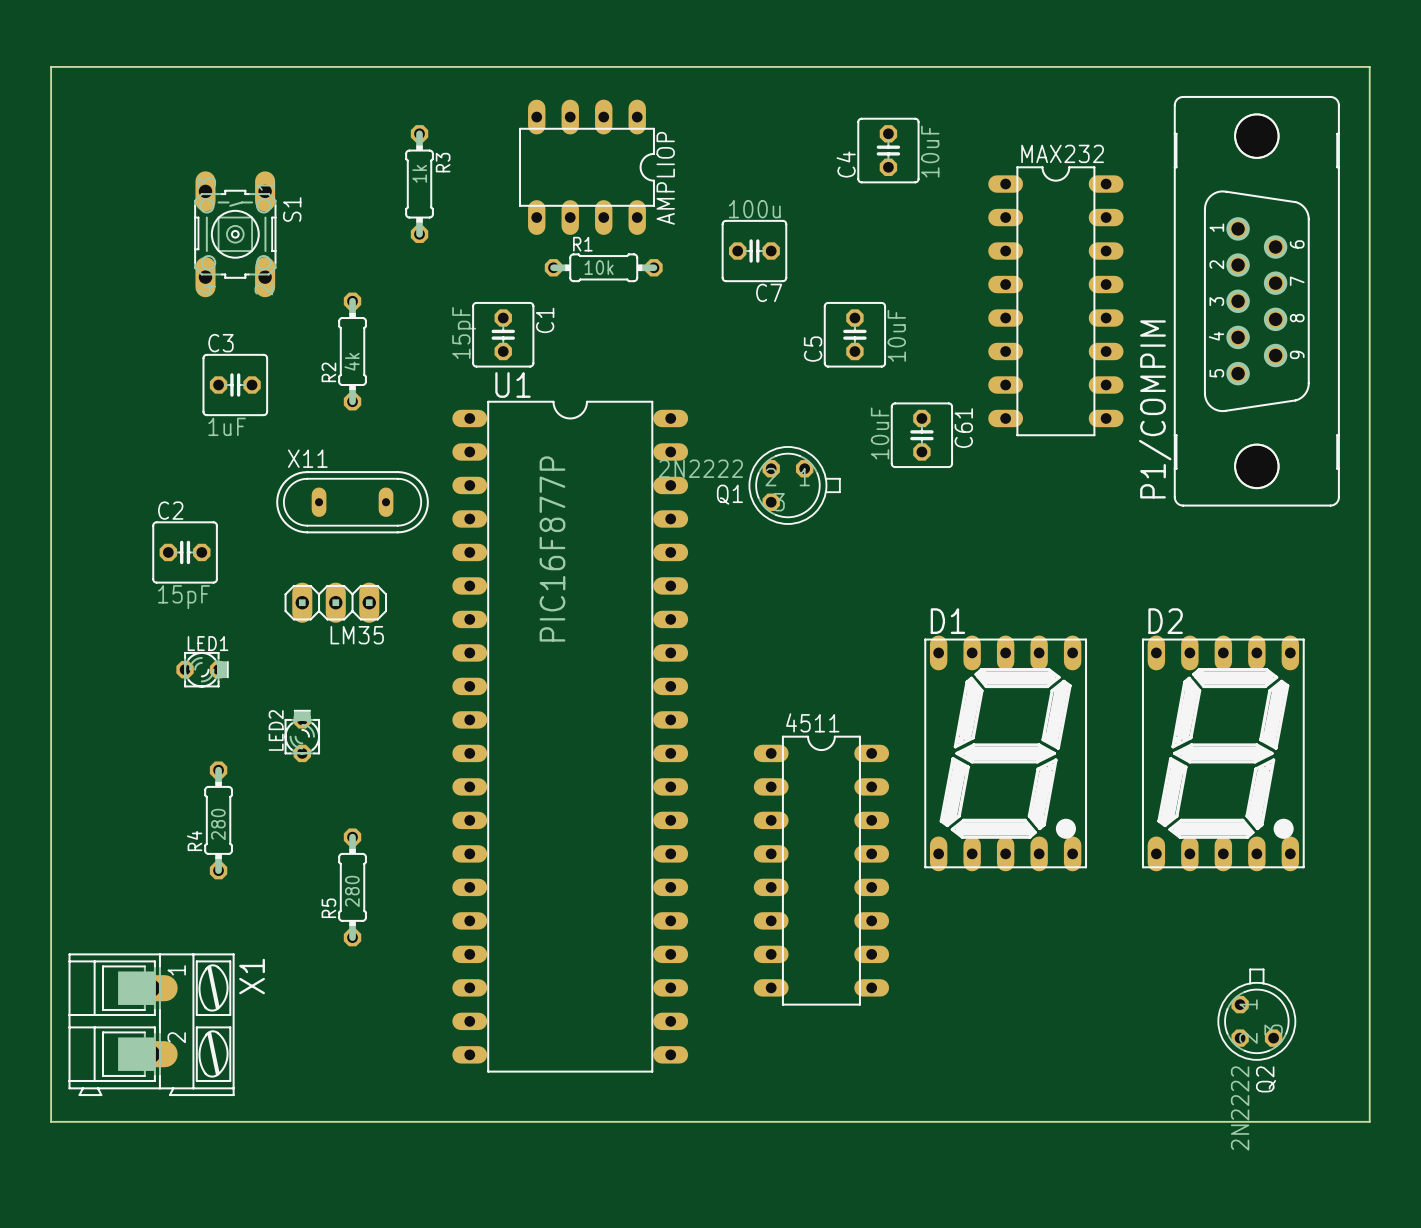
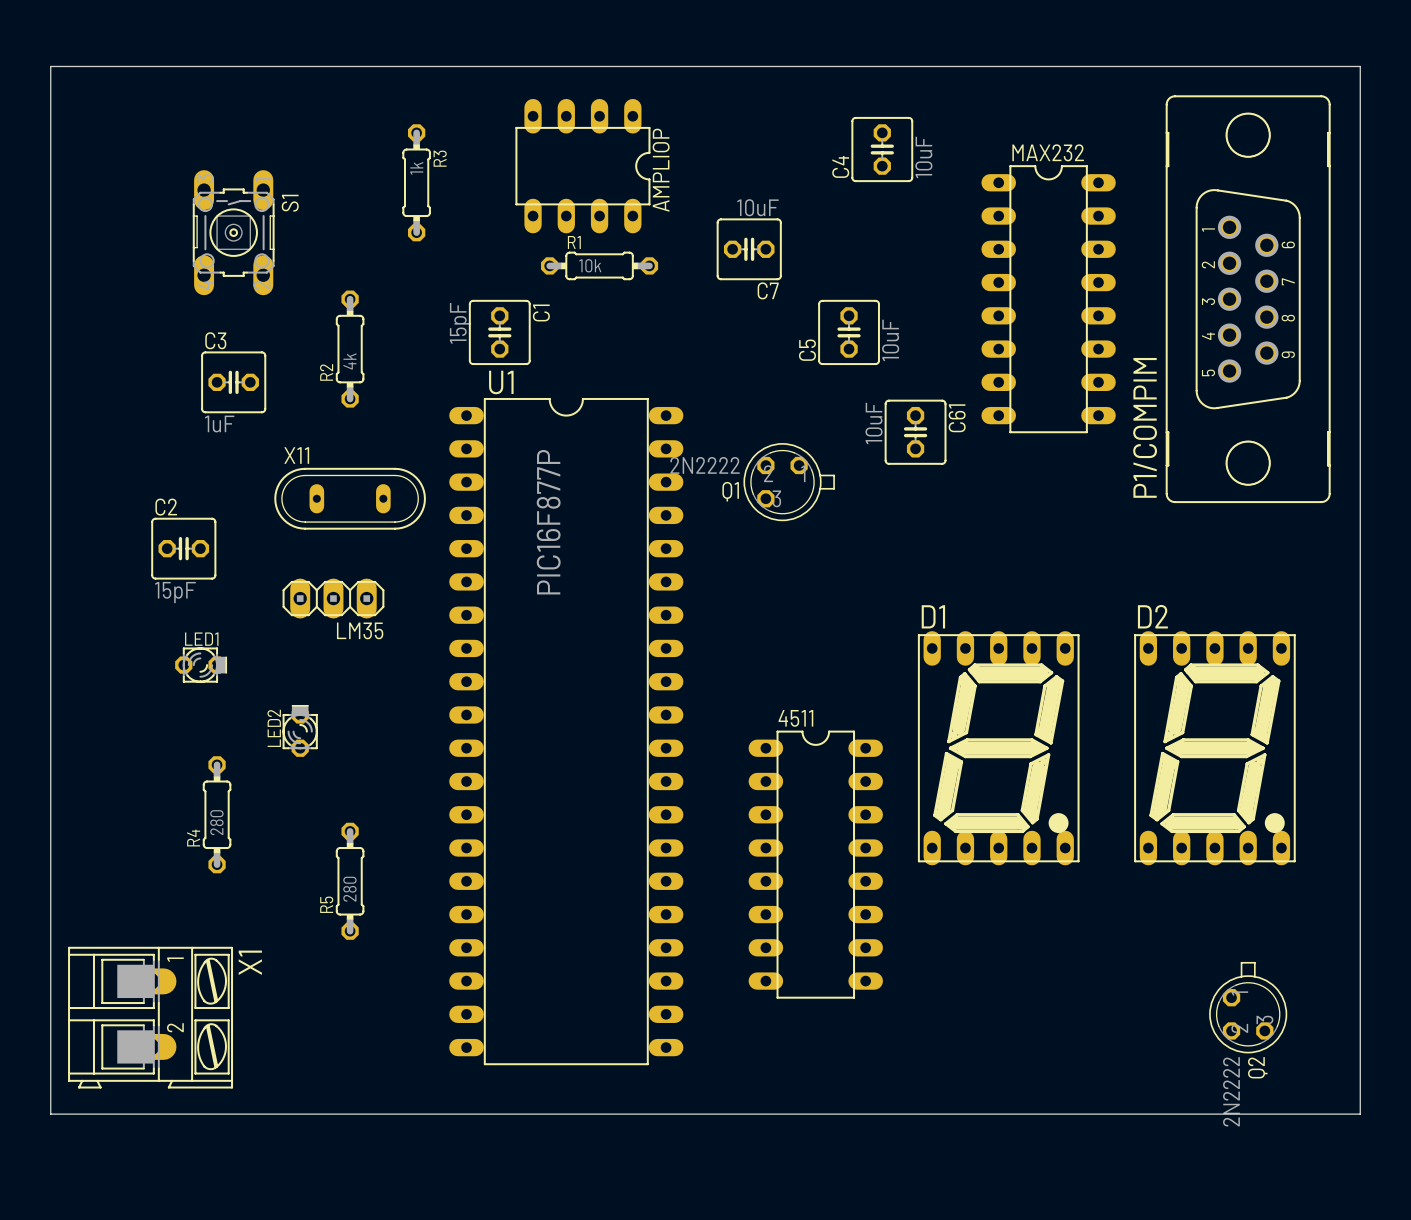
C7 value: 100u (754, 209) -> 10uF (757, 207)

